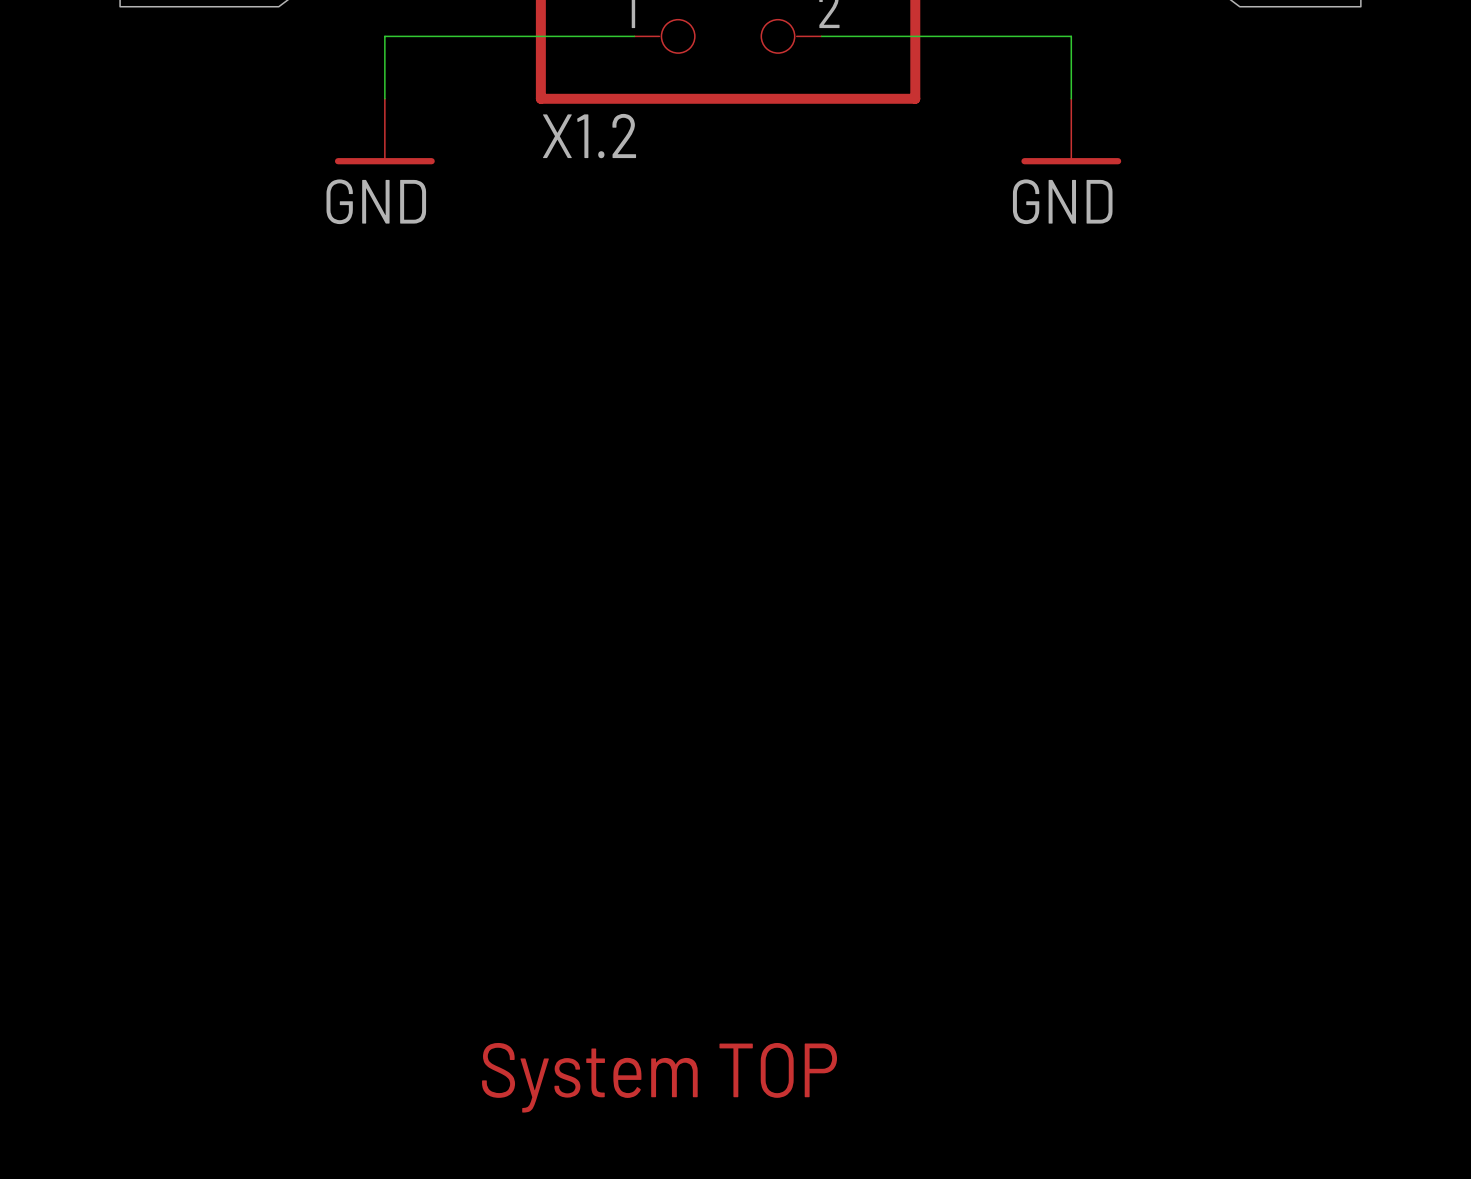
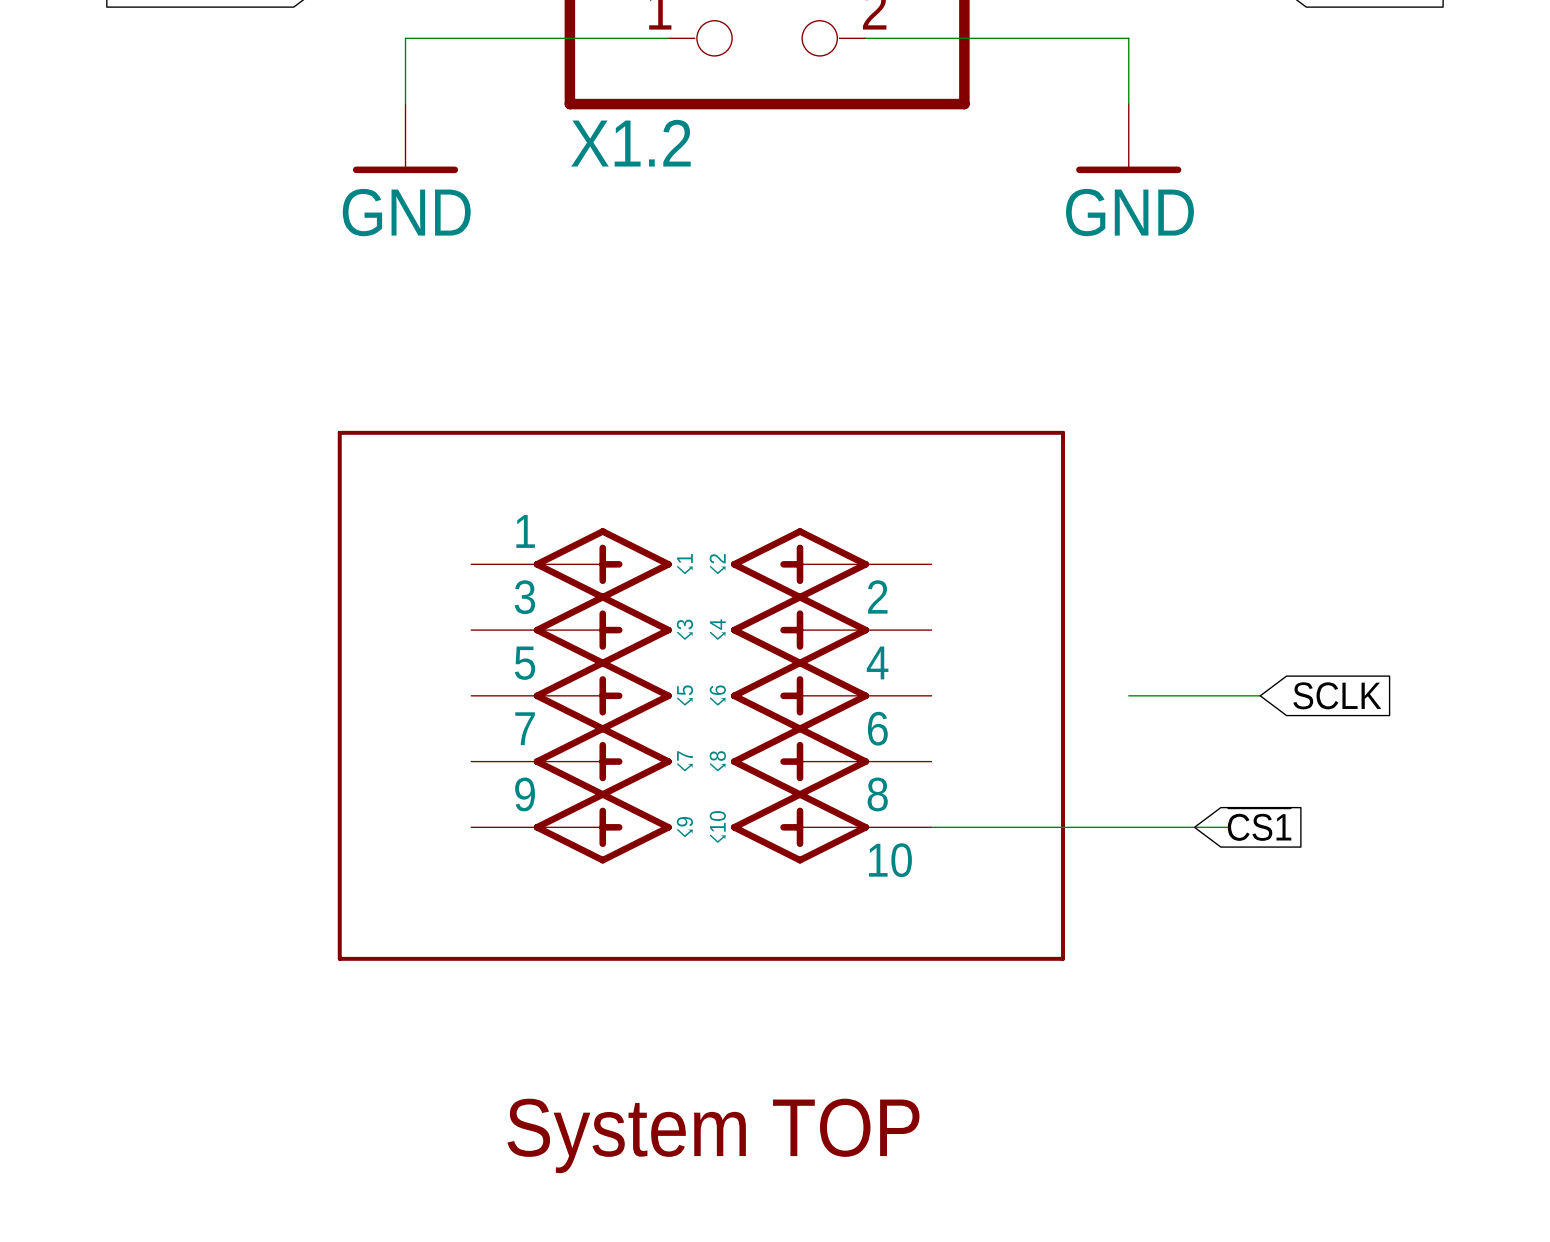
line: none -> (339, 432) (339, 958) (1063, 958) (1063, 432) (339, 432)
☇1: none -> 1 (571, 564)
☇2: none -> 2 (831, 564)
☇3: none -> 3 (571, 630)
☇4: none -> 4 (831, 630)
☇5: none -> 5 (571, 695)
☇6: none -> 6 (831, 695)
wire: none -> (1128, 695) (1260, 695)
global label: none -> SCLK (1337, 695)
☇7: none -> 7 (571, 761)
☇8: none -> 8 (831, 761)
global label: none -> ~{CS1} (1259, 824)
☇9: none -> 9 (571, 827)
☇10: none -> 10 (831, 827)
wire: none -> (931, 827) (1227, 827)

